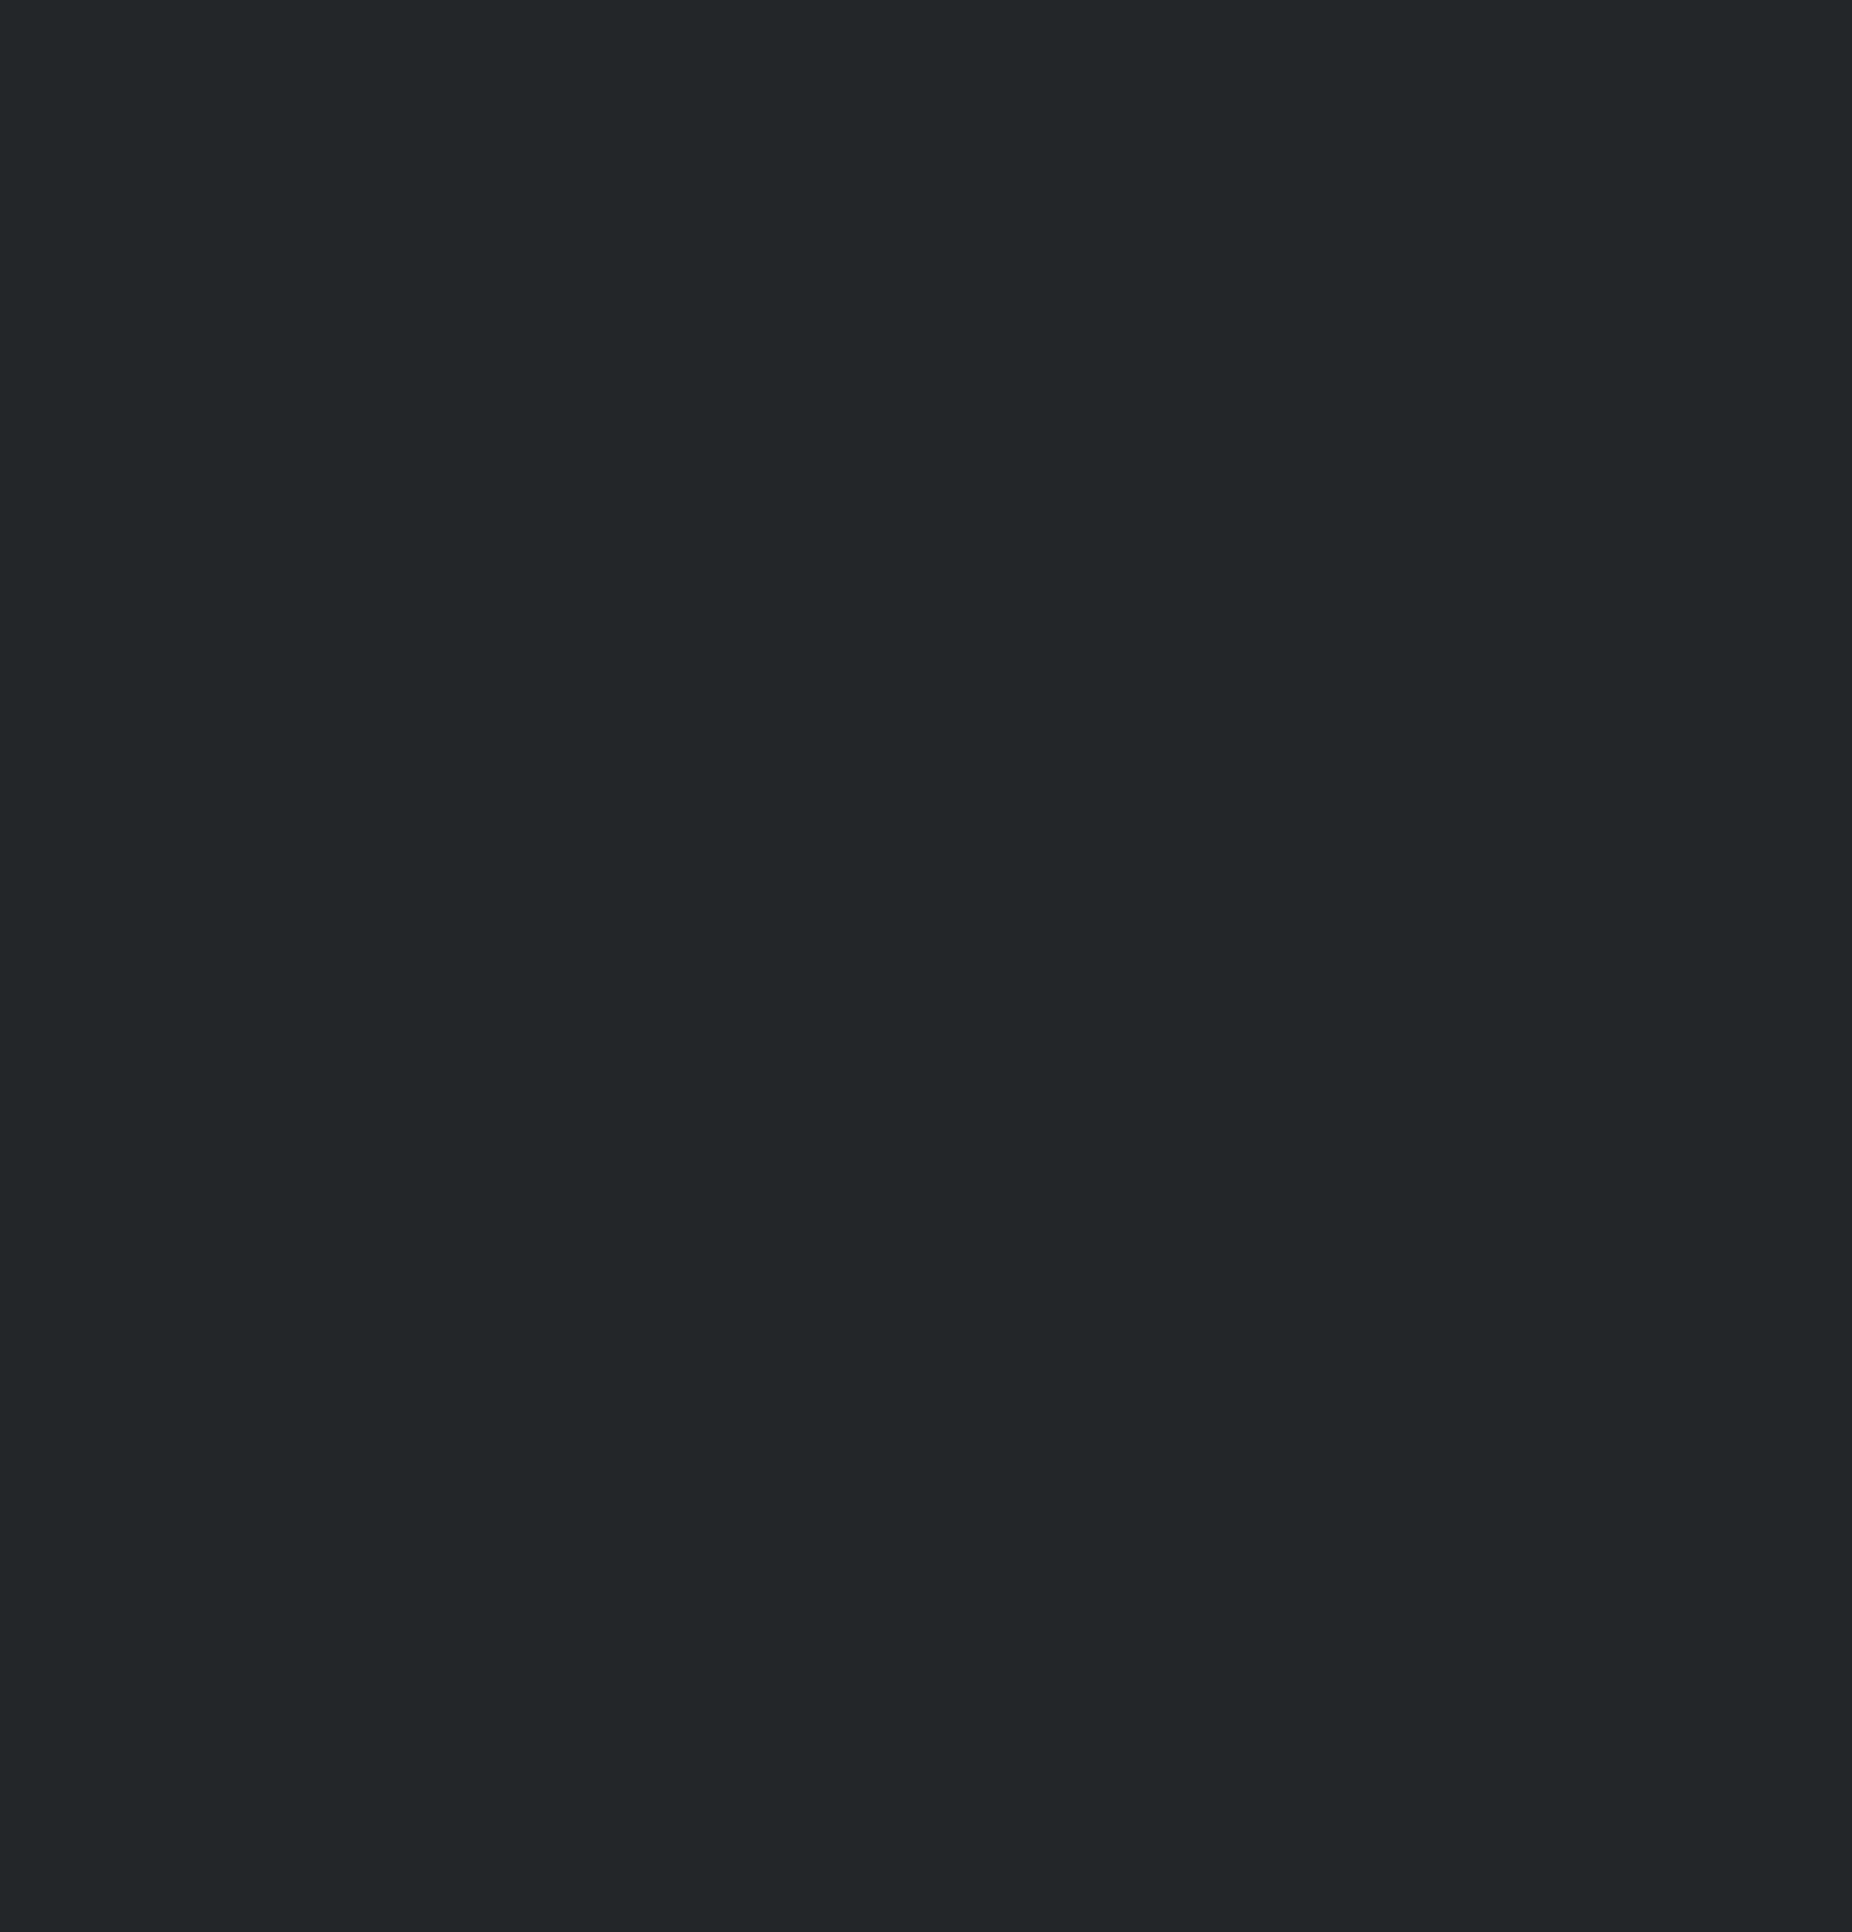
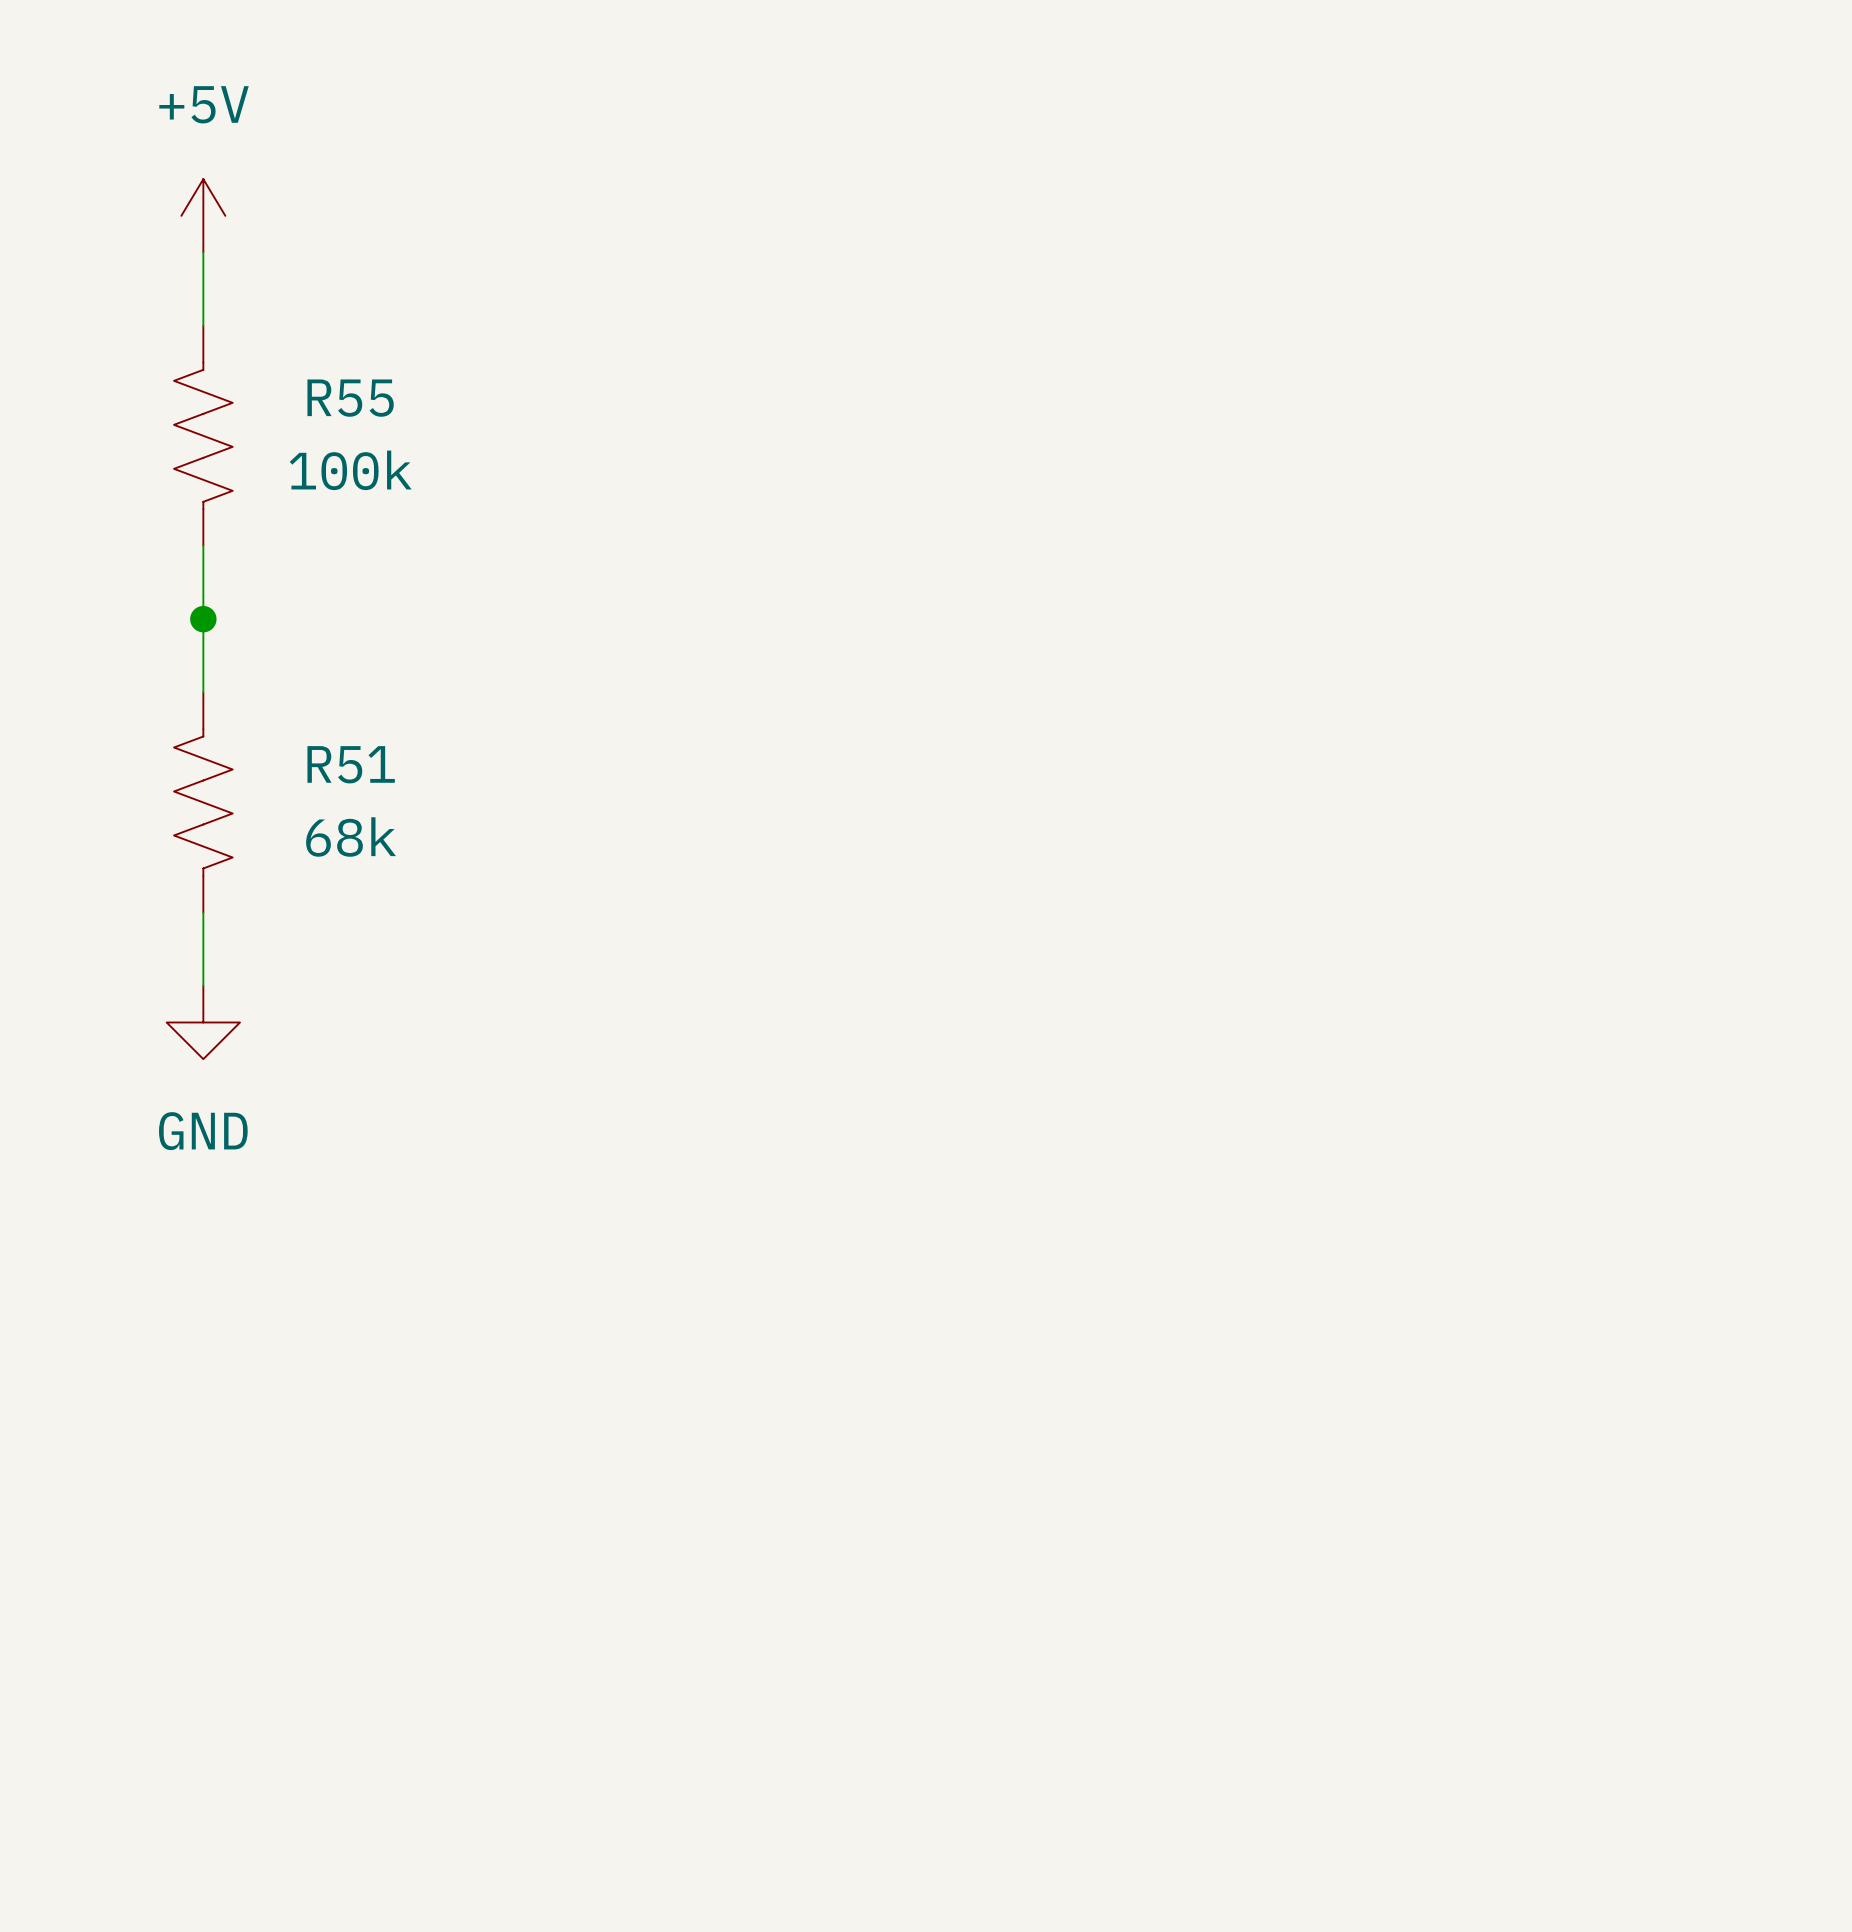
power symbol: none -> +5V (203, 215)
wire: none -> (203, 252) (203, 325)
R55: none -> 100k (203, 435)
wire: none -> (203, 545) (203, 692)
junction: none -> (203, 619)
R51: none -> 68k (203, 802)
wire: none -> (203, 912) (203, 985)
power symbol: none -> GND (203, 1022)

